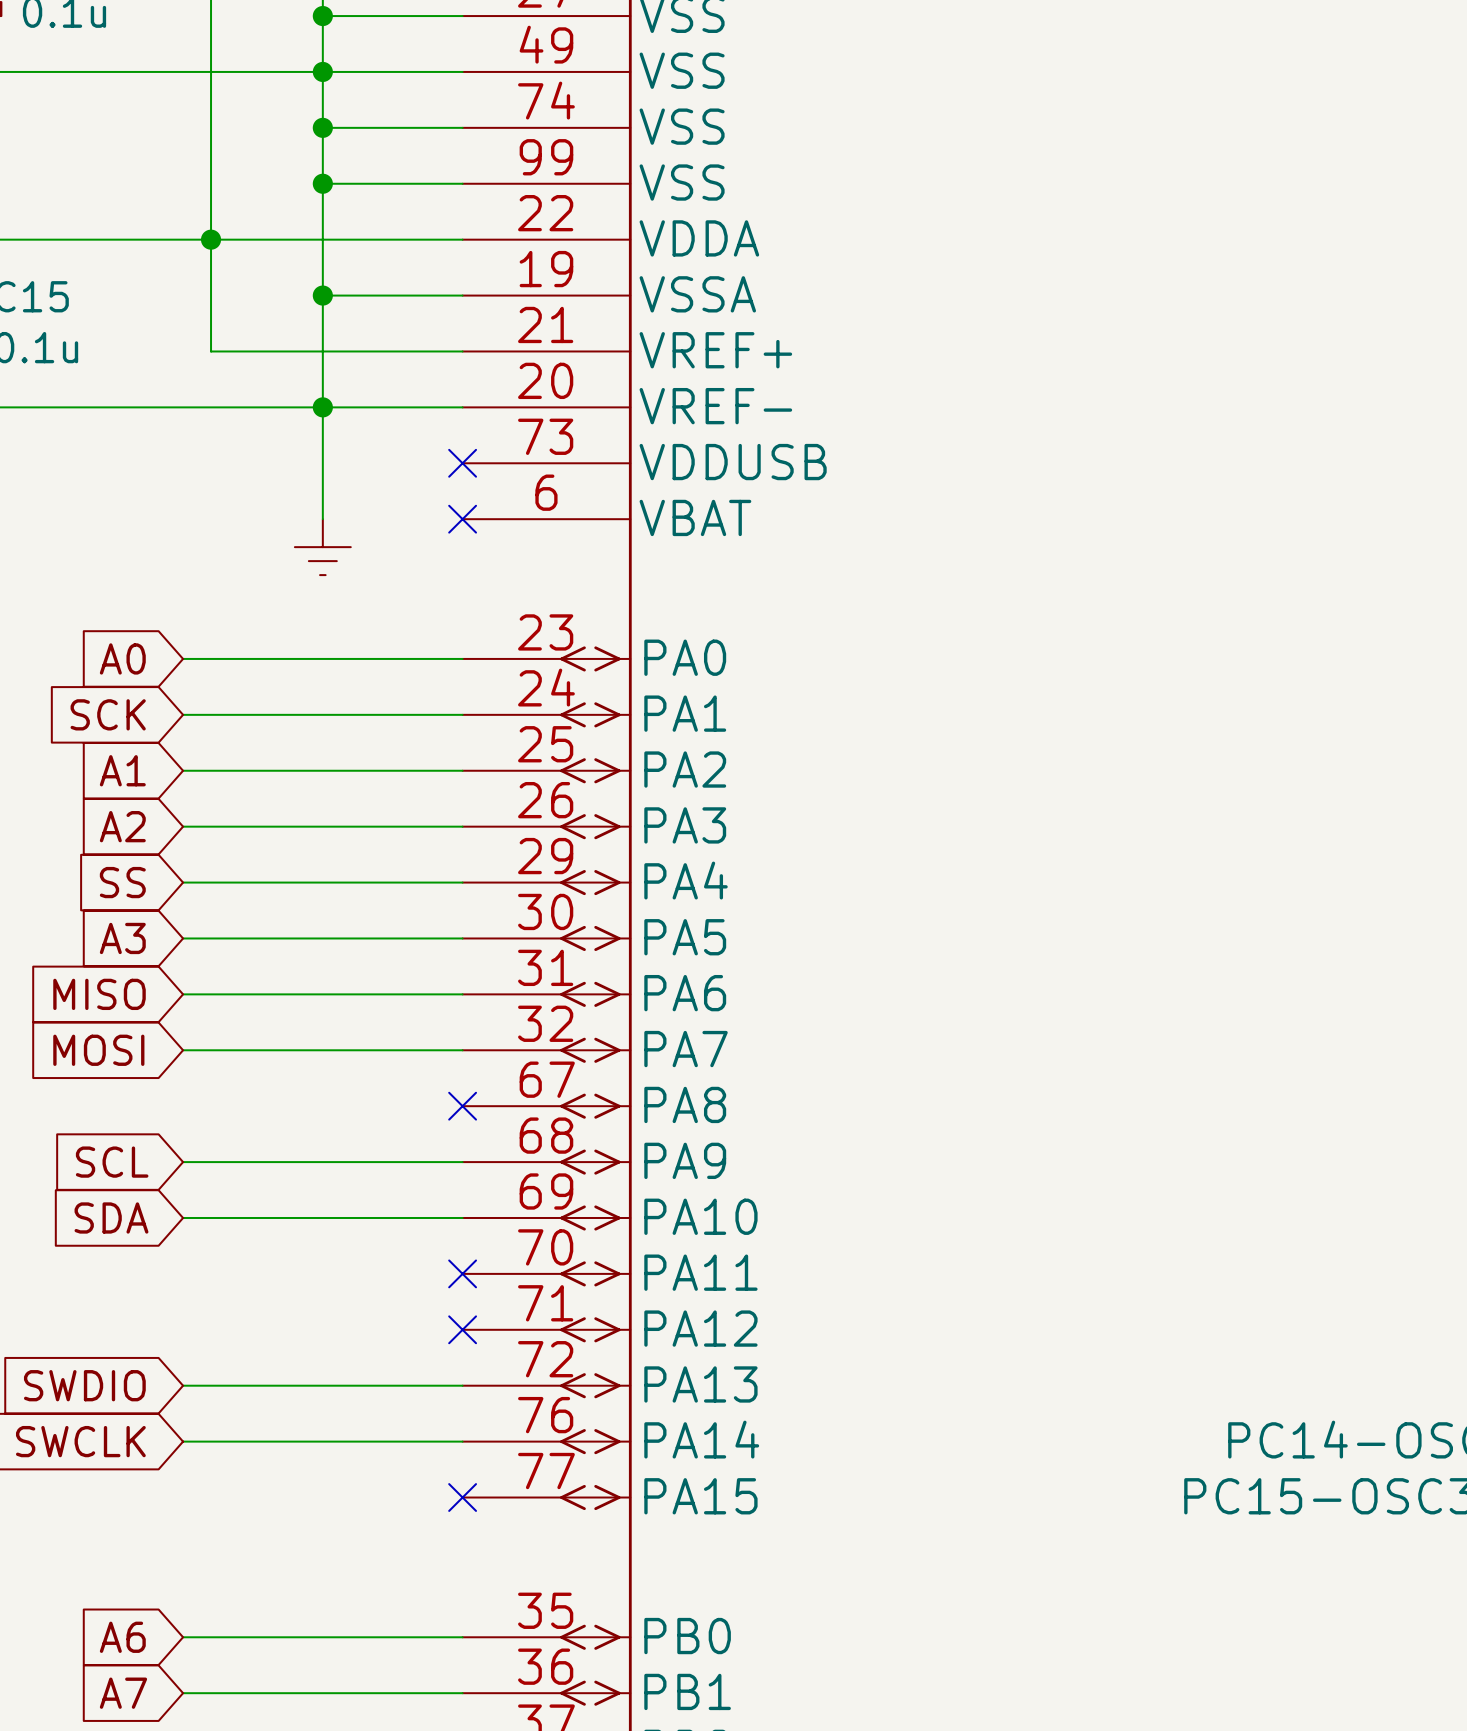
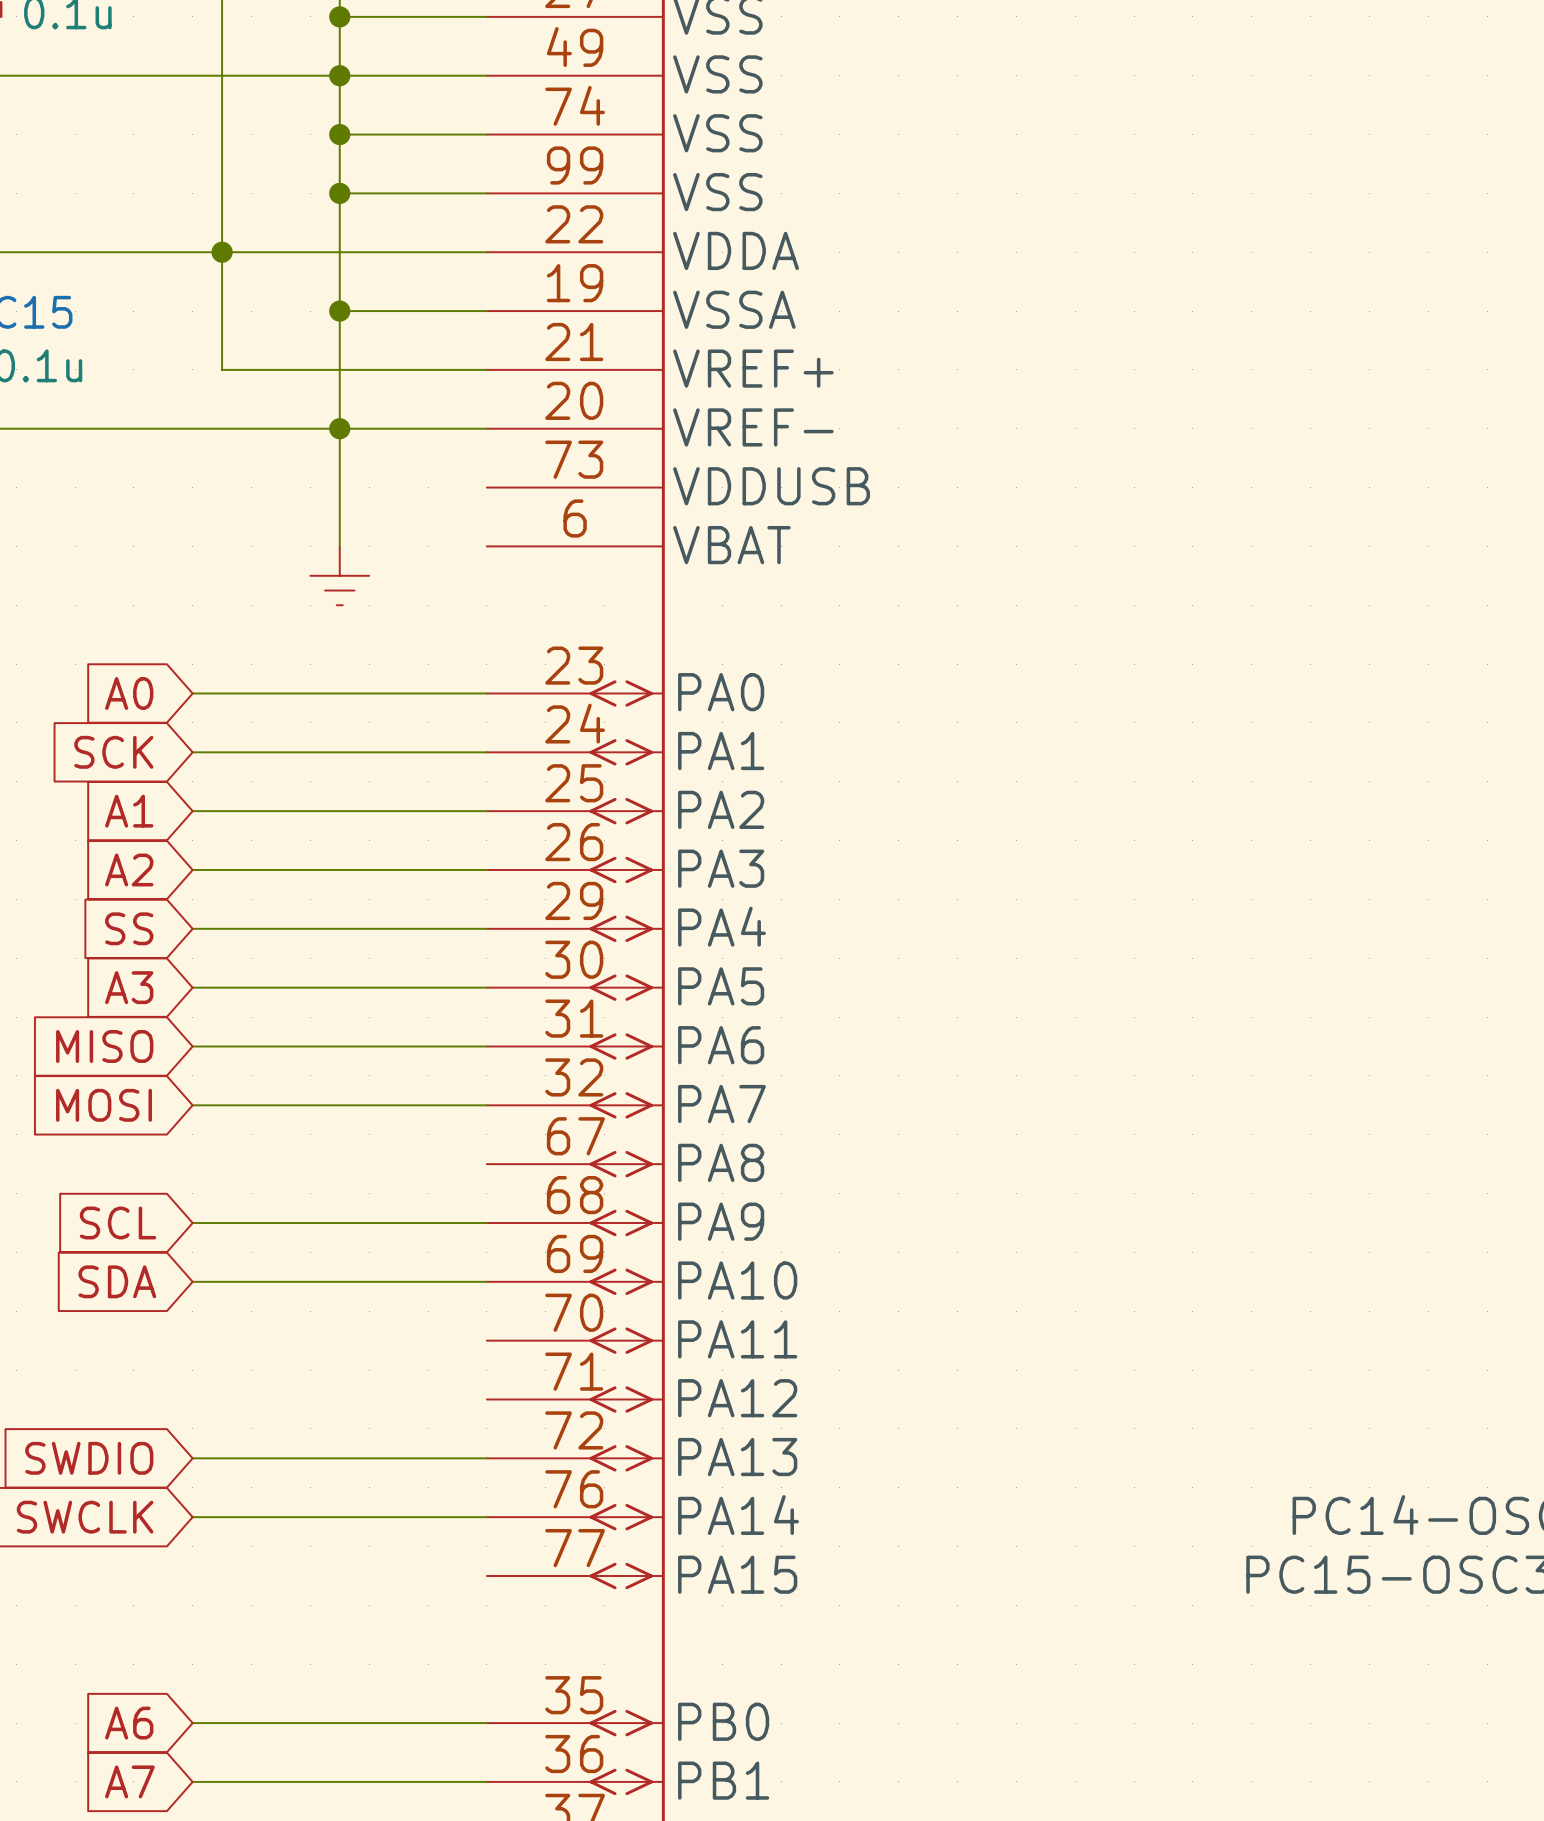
no-connect mark: (462, 463) -> none
no-connect mark: (462, 519) -> none
no-connect mark: (462, 1106) -> none
no-connect mark: (462, 1273) -> none
no-connect mark: (462, 1329) -> none
no-connect mark: (462, 1497) -> none

